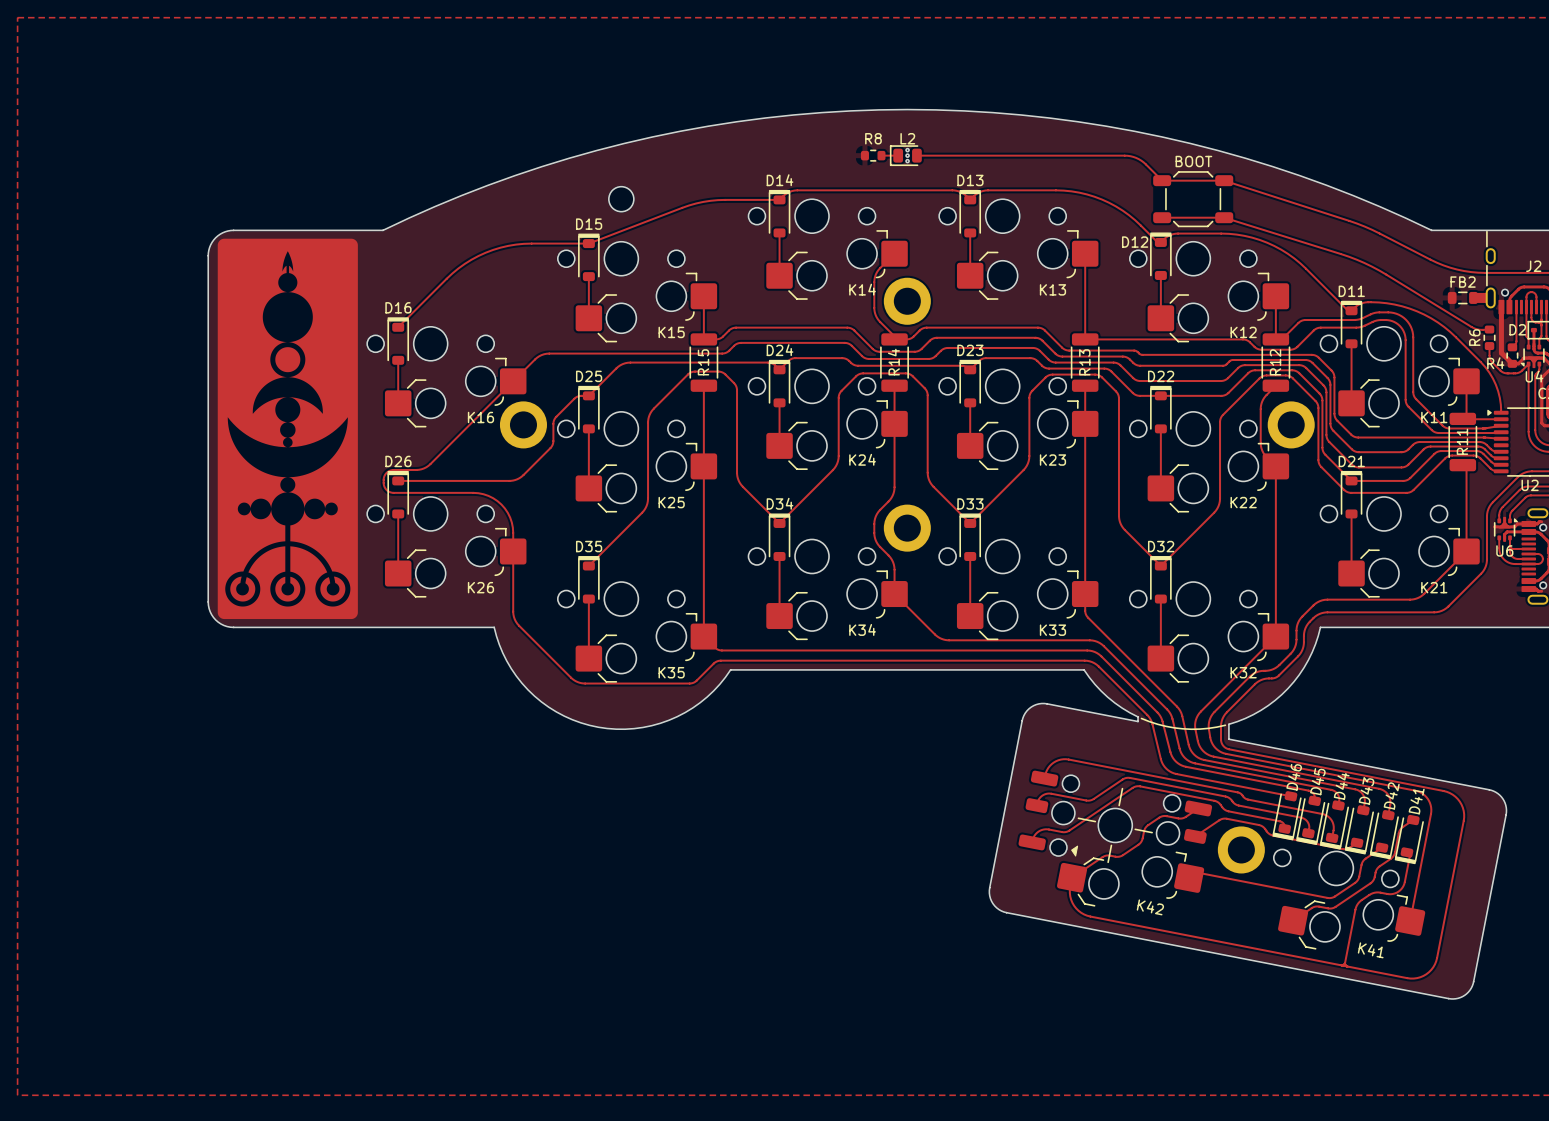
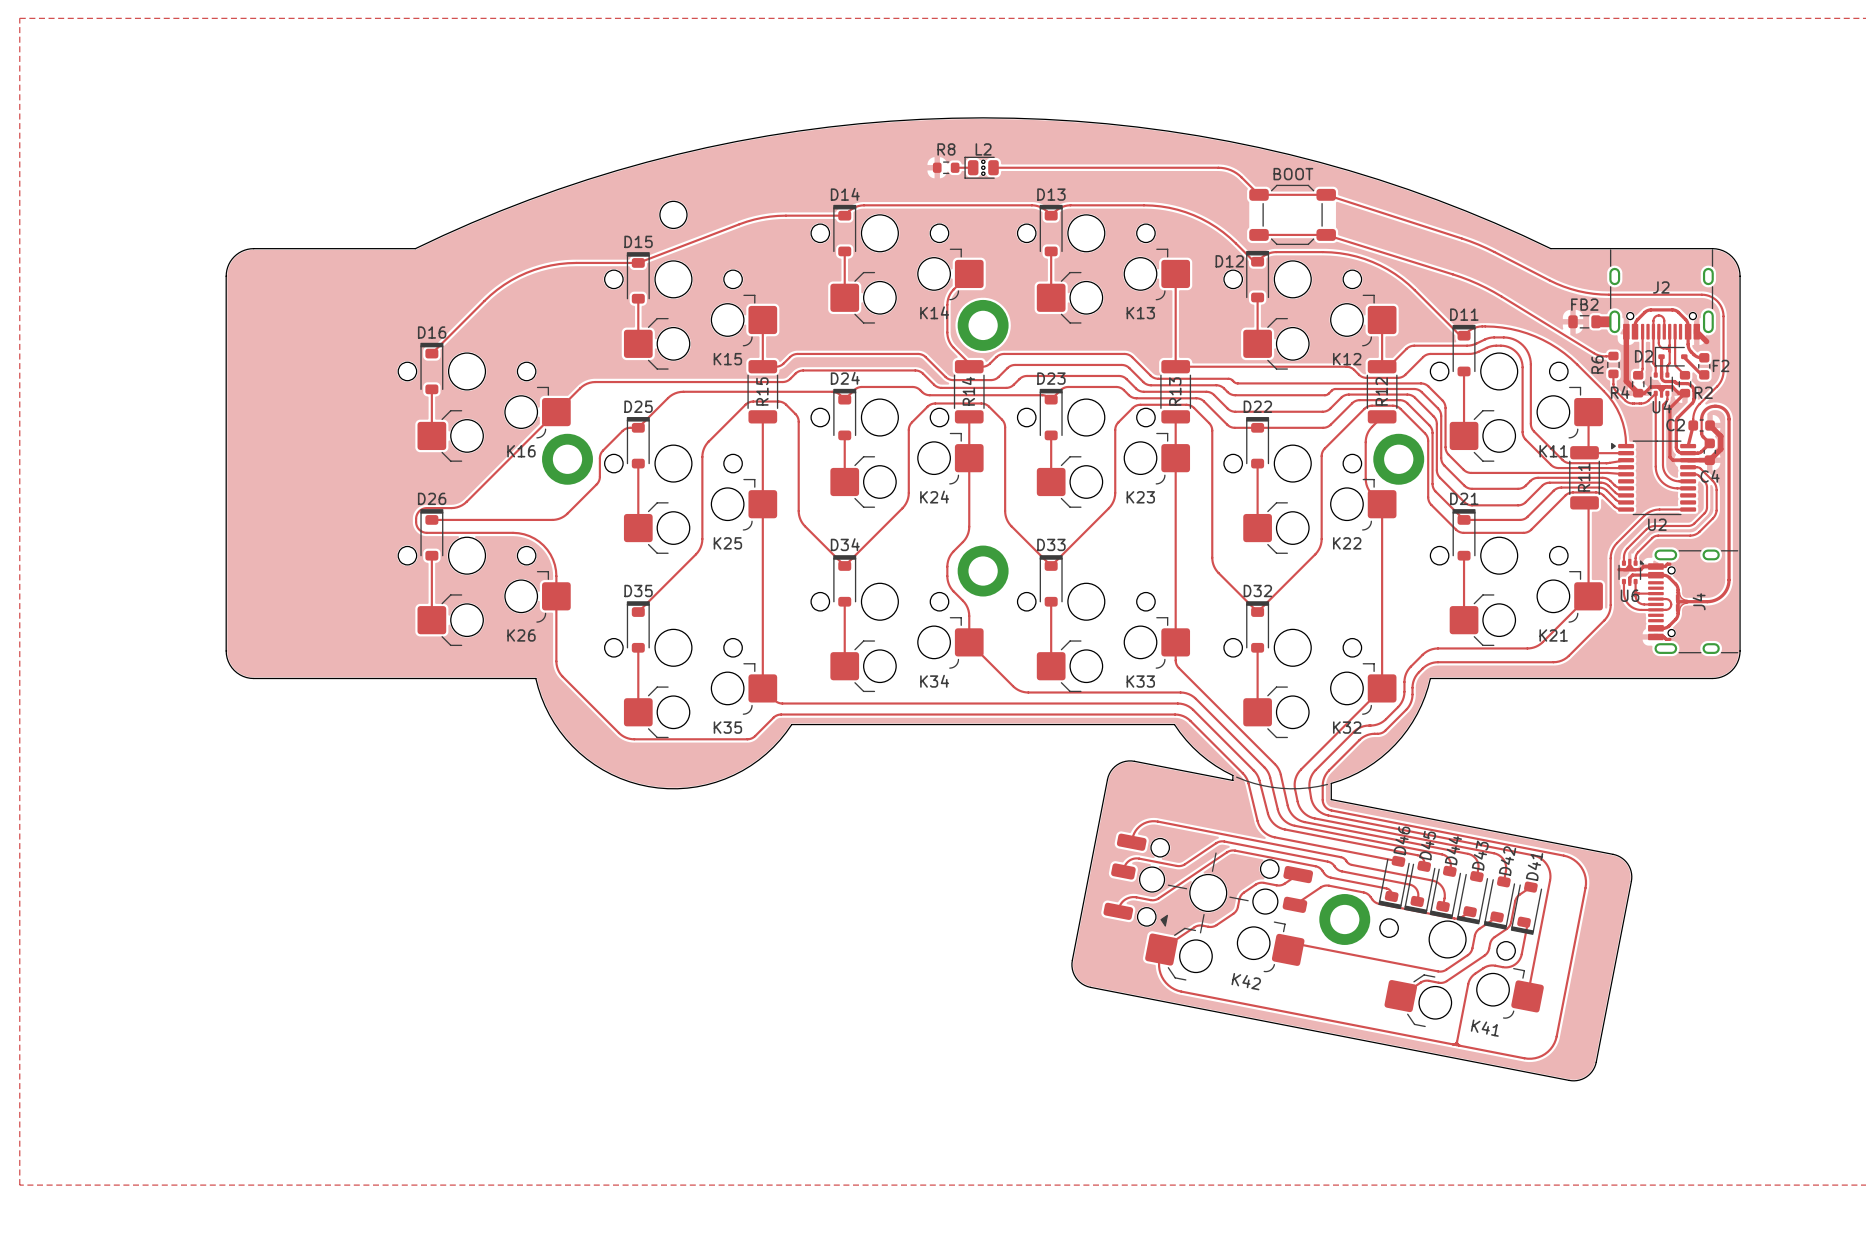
drawing: [217, 238, 358, 620] -> none

